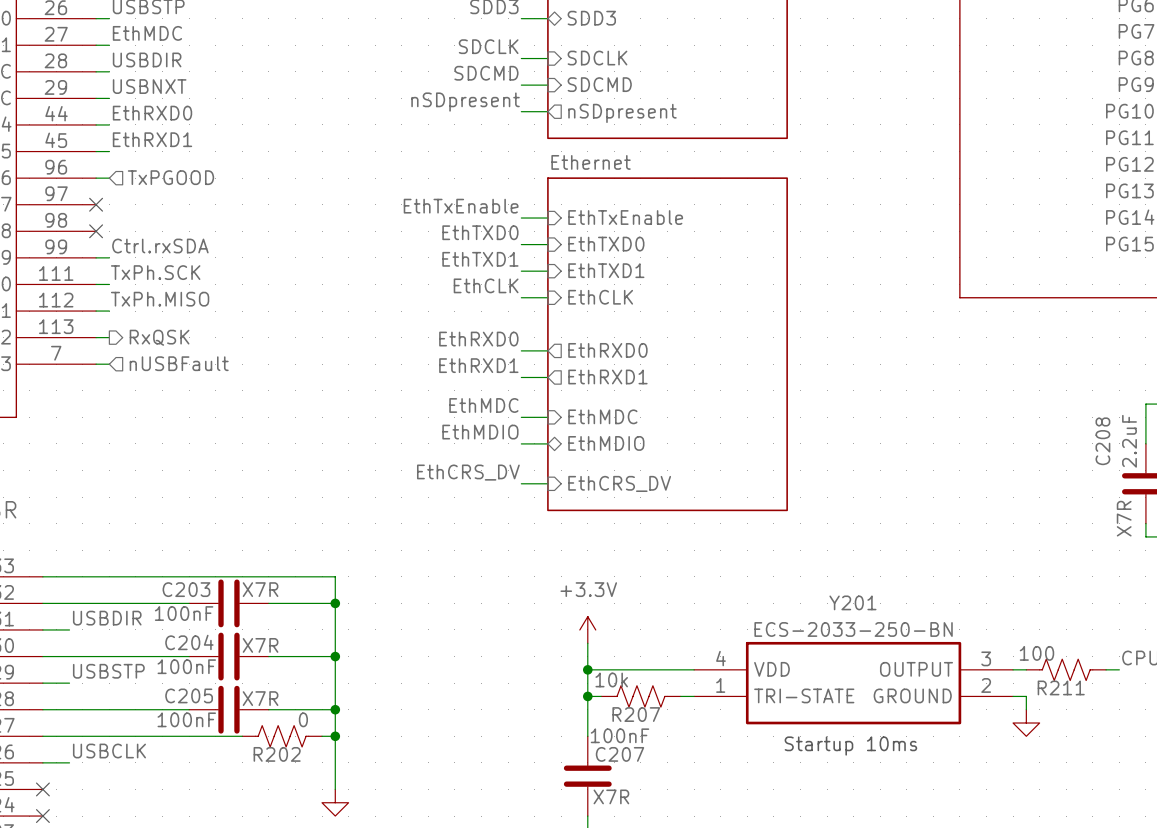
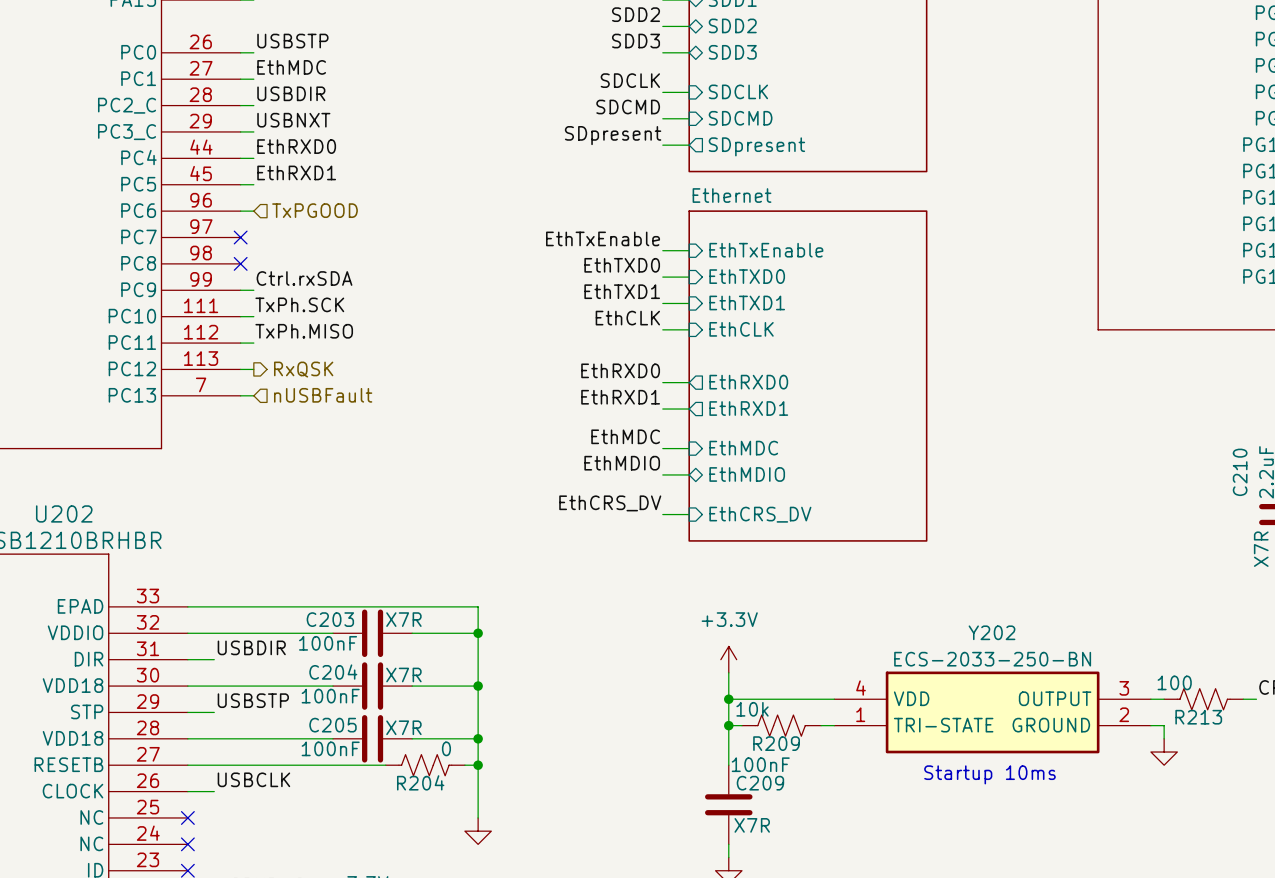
label: nSDpresent (465, 102) -> SDpresent (613, 135)
sheet pin: nSDpresent (622, 113) -> SDpresent (756, 146)
C208 name: C208 (1102, 441) -> C210 (1240, 472)
Y201 name: Y201 (852, 602) -> Y202 (992, 632)
R211 name: R211 (1061, 687) -> R213 (1198, 717)
R207 name: R207 (636, 714) -> R209 (776, 743)
R202 name: R202 (277, 754) -> R204 (420, 782)
C207 name: C207 (620, 754) -> C209 (760, 783)

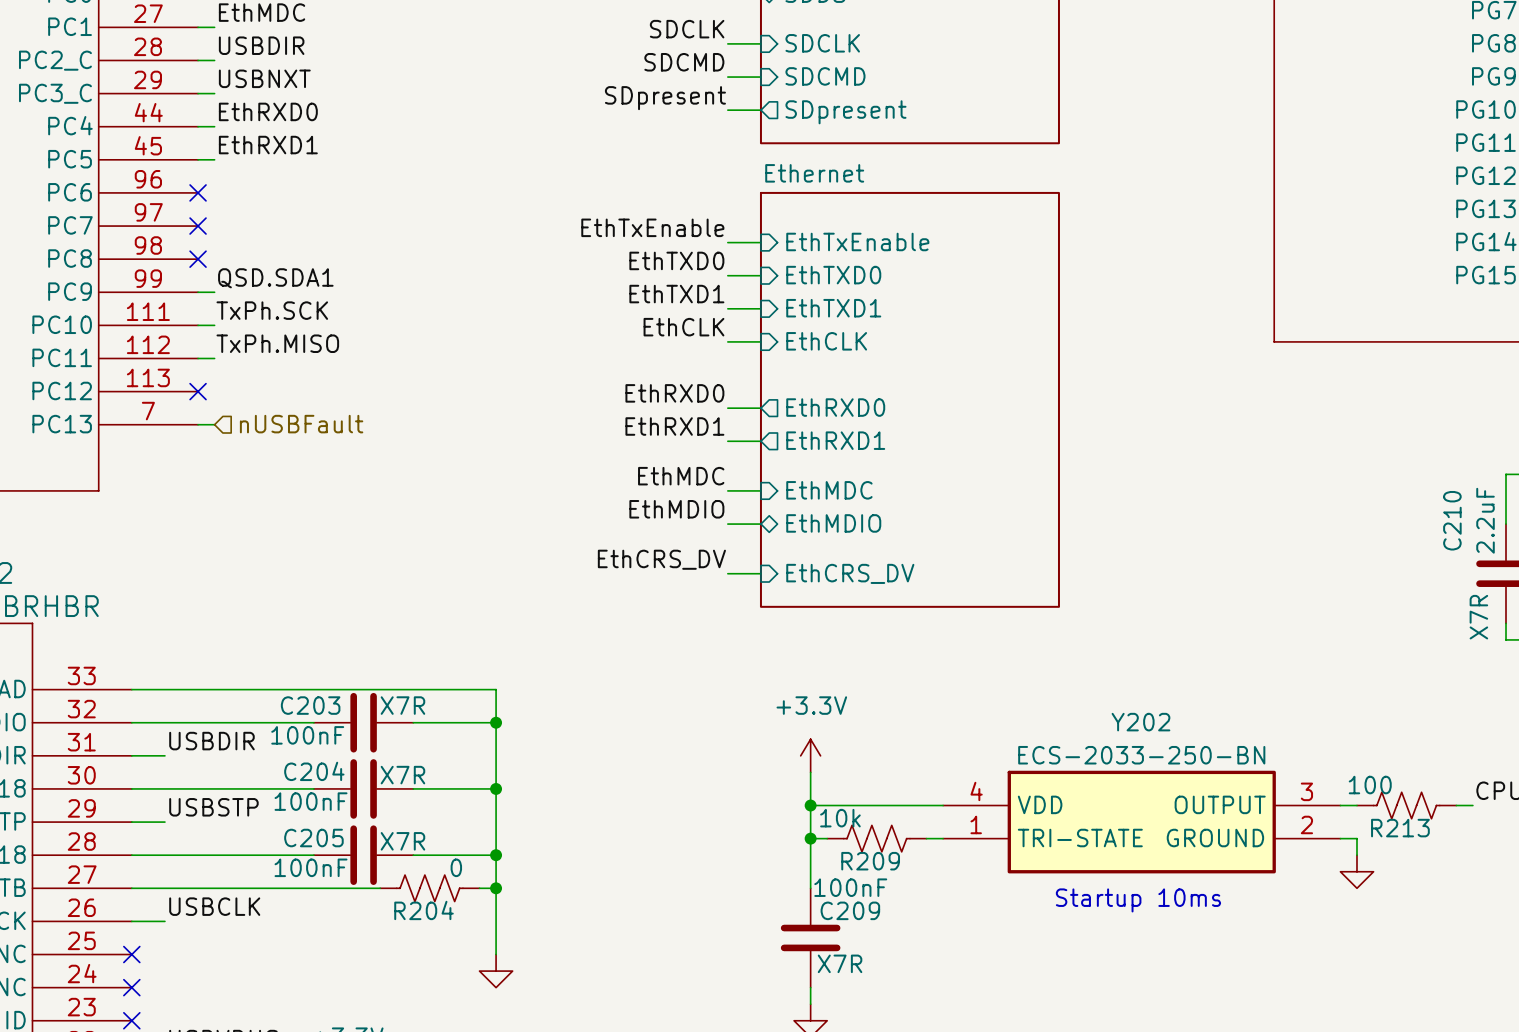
hierarchical label: TxPGOOD (314, 210) -> none
wire: (240, 211) (253, 211) -> none
no-connect mark: none -> (198, 192)
label: Ctrl.rxSDA (304, 278) -> QSD.SDA1 (275, 278)
wire: (240, 369) (253, 369) -> none
no-connect mark: none -> (198, 391)
hierarchical label: RxQSK (303, 369) -> none

